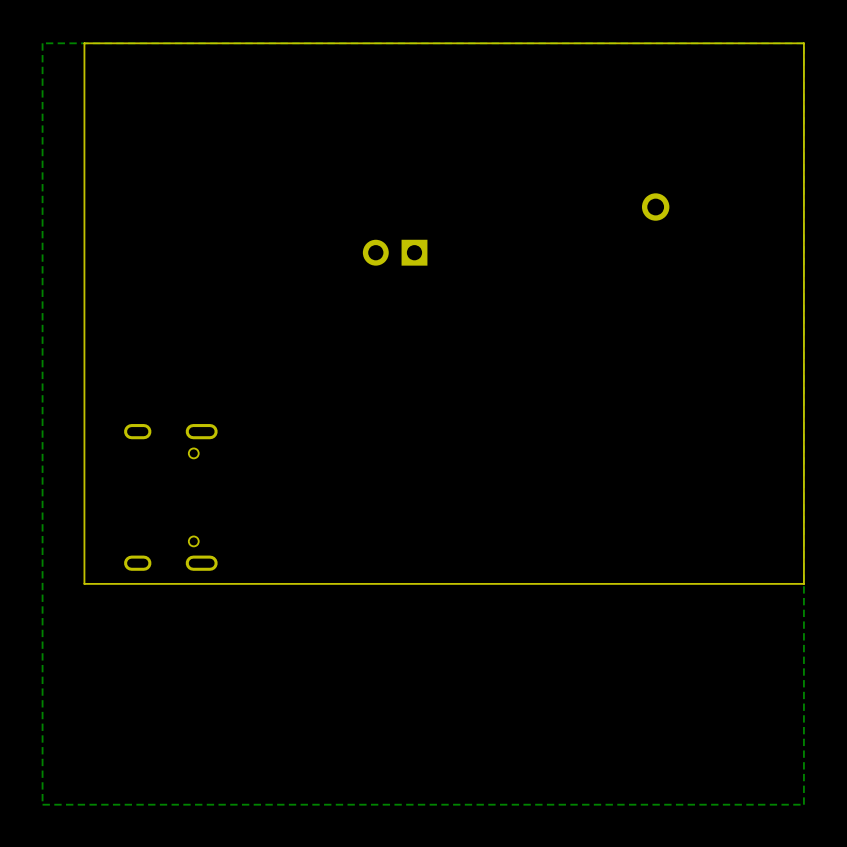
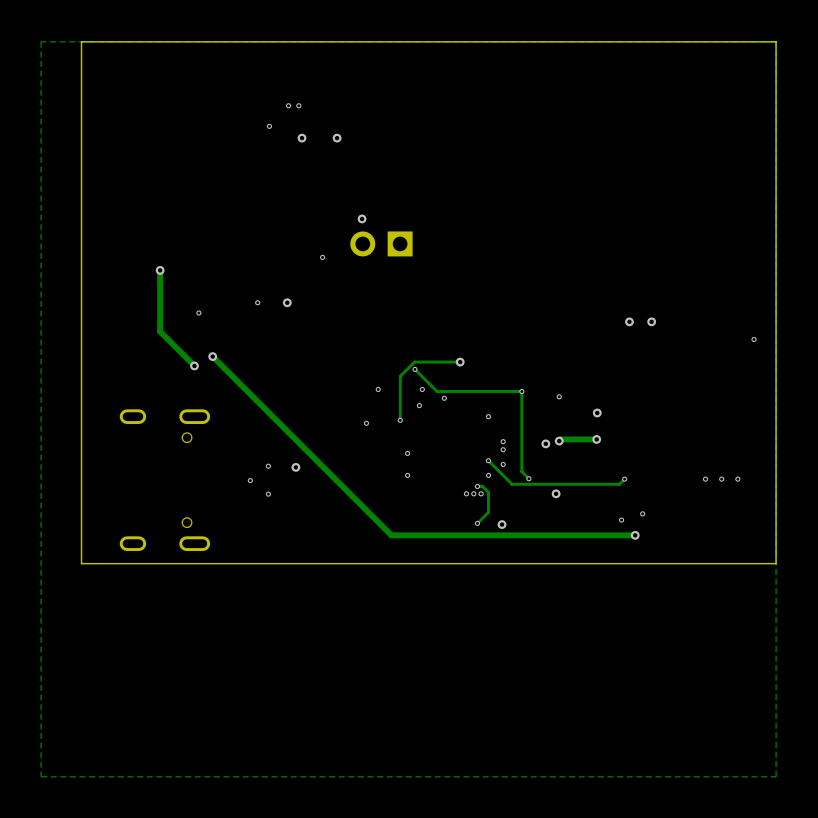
via: none -> (288, 105)
via: none -> (298, 105)
via: none -> (269, 126)
via: none -> (302, 138)
via: none -> (337, 138)
part: (655, 207) -> none
via: none -> (362, 218)
via: none -> (322, 257)
track: none -> (160, 270) (160, 331) (194, 365)
via: none -> (160, 270)
via: none -> (257, 302)
via: none -> (287, 302)
via: none -> (198, 313)
via: none -> (629, 321)
via: none -> (651, 321)
via: none -> (754, 339)
track: none -> (212, 356) (391, 535) (635, 535)
via: none -> (212, 356)
track: none -> (460, 362) (414, 362) (400, 376) (400, 420)
via: none -> (460, 362)
via: none -> (194, 365)
track: none -> (414, 369) (437, 391) (521, 391) (521, 471) (528, 478)
via: none -> (414, 369)
via: none -> (378, 389)
via: none -> (422, 389)
via: none -> (521, 391)
via: none -> (559, 396)
via: none -> (444, 398)
via: none -> (419, 405)
via: none -> (597, 412)
via: none -> (488, 416)
via: none -> (400, 420)
via: none -> (366, 423)
track: none -> (596, 439) (560, 439) (559, 441)
via: none -> (596, 439)
via: none -> (559, 441)
via: none -> (503, 441)
via: none -> (545, 443)
via: none -> (503, 449)
via: none -> (407, 453)
track: none -> (488, 460) (512, 484) (619, 484) (624, 479)
via: none -> (488, 460)
via: none -> (503, 464)
via: none -> (268, 466)
via: none -> (295, 467)
via: none -> (407, 475)
via: none -> (488, 475)
via: none -> (528, 478)
via: none -> (624, 479)
via: none -> (705, 479)
via: none -> (721, 479)
via: none -> (737, 479)
via: none -> (250, 480)
track: none -> (477, 486) (482, 486) (488, 492) (488, 512) (477, 523)
via: none -> (477, 486)
via: none -> (268, 494)
via: none -> (466, 493)
via: none -> (473, 493)
via: none -> (481, 493)
via: none -> (556, 493)
via: none -> (642, 513)
via: none -> (621, 520)
via: none -> (477, 523)
via: none -> (502, 524)
via: none -> (635, 535)

